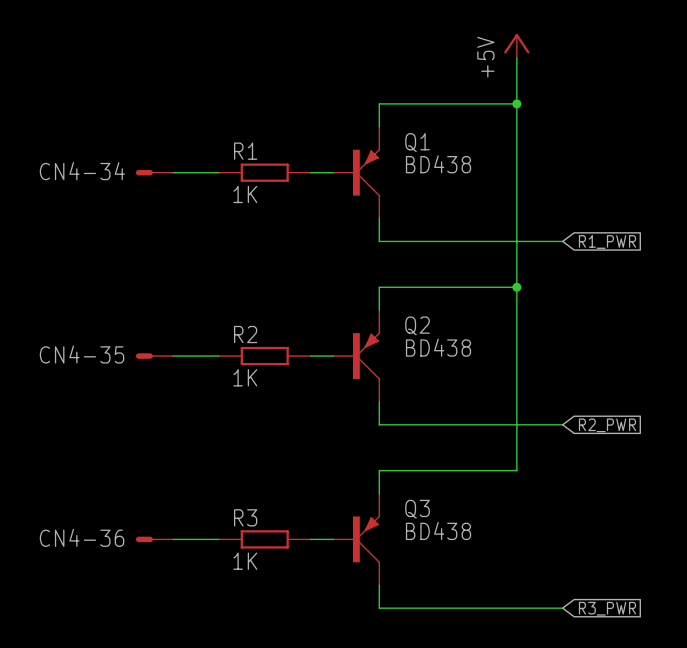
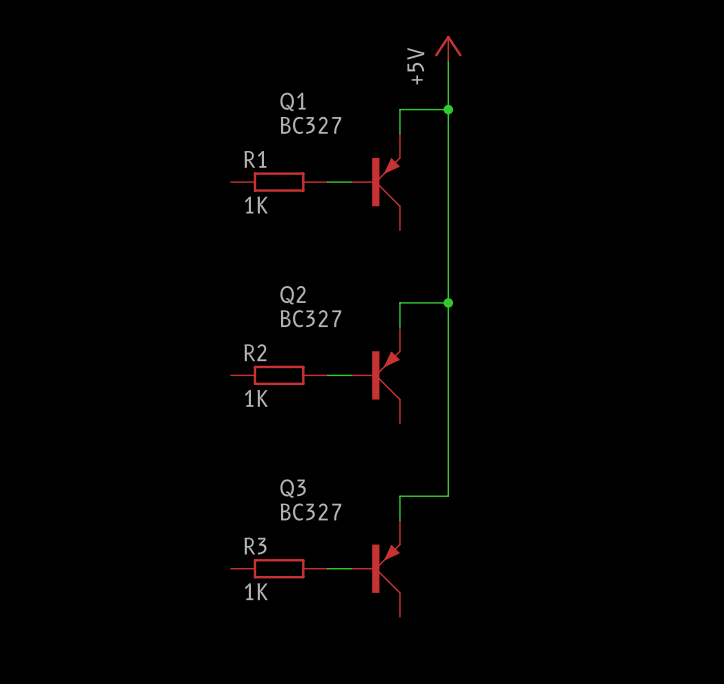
power symbol position: +5V (516, 46) -> +5V (448, 48)
wire: (516, 58) (516, 470) (425, 470) -> (448, 61) (448, 496)
wire: (425, 103) (516, 103) -> none
junction: none -> (448, 109)
junction: (516, 103) -> none
Q1 name position: Q1 (417, 142) -> Q1 (293, 101)
Q1 value: BD438 (438, 164) -> BC327 (310, 125)
CN4-34: (154, 172) -> none
wire: (173, 172) (218, 172) -> none
wire: (379, 218) (379, 241) (562, 241) -> none
global label: R1_PWR (607, 241) -> none
wire: (425, 287) (516, 287) -> none
junction: none -> (448, 302)
junction: (516, 287) -> none
Q2 name position: Q2 (417, 325) -> Q2 (293, 295)
Q2 value: BD438 (438, 347) -> BC327 (310, 318)
CN4-35: (154, 356) -> none
wire: (173, 356) (218, 356) -> none
wire: (379, 401) (379, 424) (562, 424) -> none
global label: R2_PWR (607, 425) -> none
Q3 name position: Q3 (417, 509) -> Q3 (293, 488)
Q3 value: BD438 (438, 531) -> BC327 (310, 512)
CN4-36: (154, 539) -> none
wire: (173, 539) (218, 539) -> none
wire: (379, 585) (379, 608) (562, 608) -> none
global label: R3_PWR (607, 608) -> none

